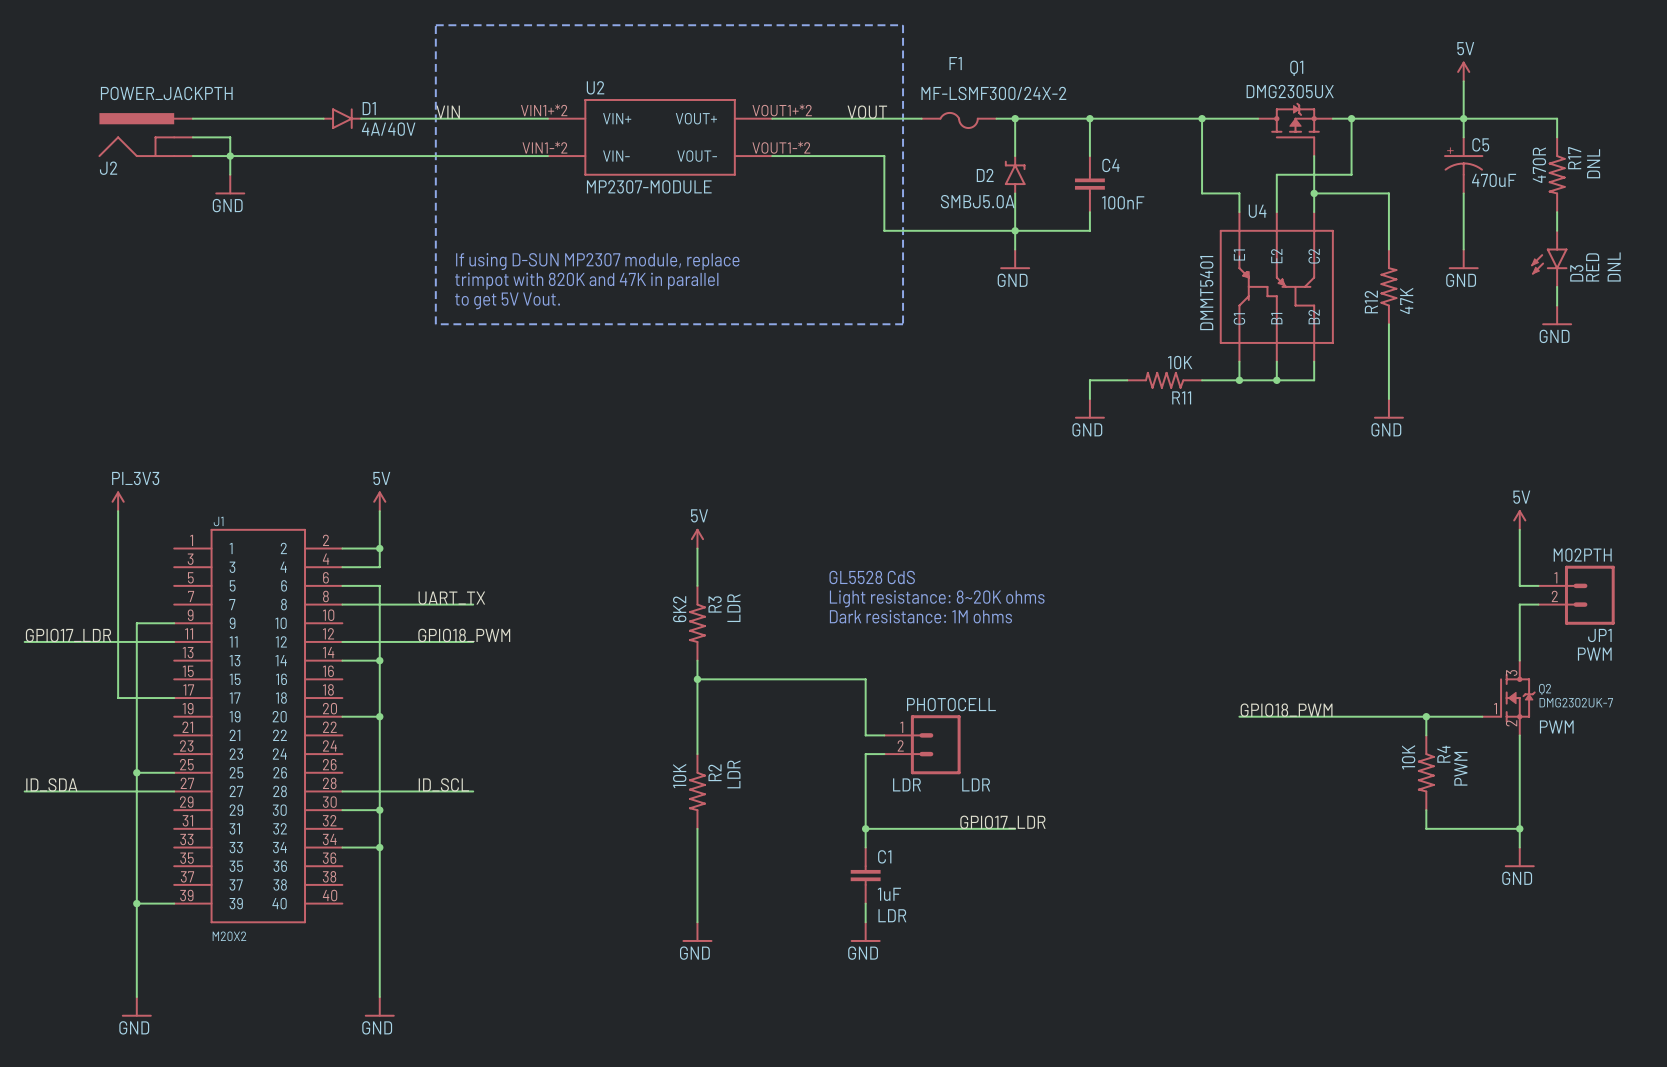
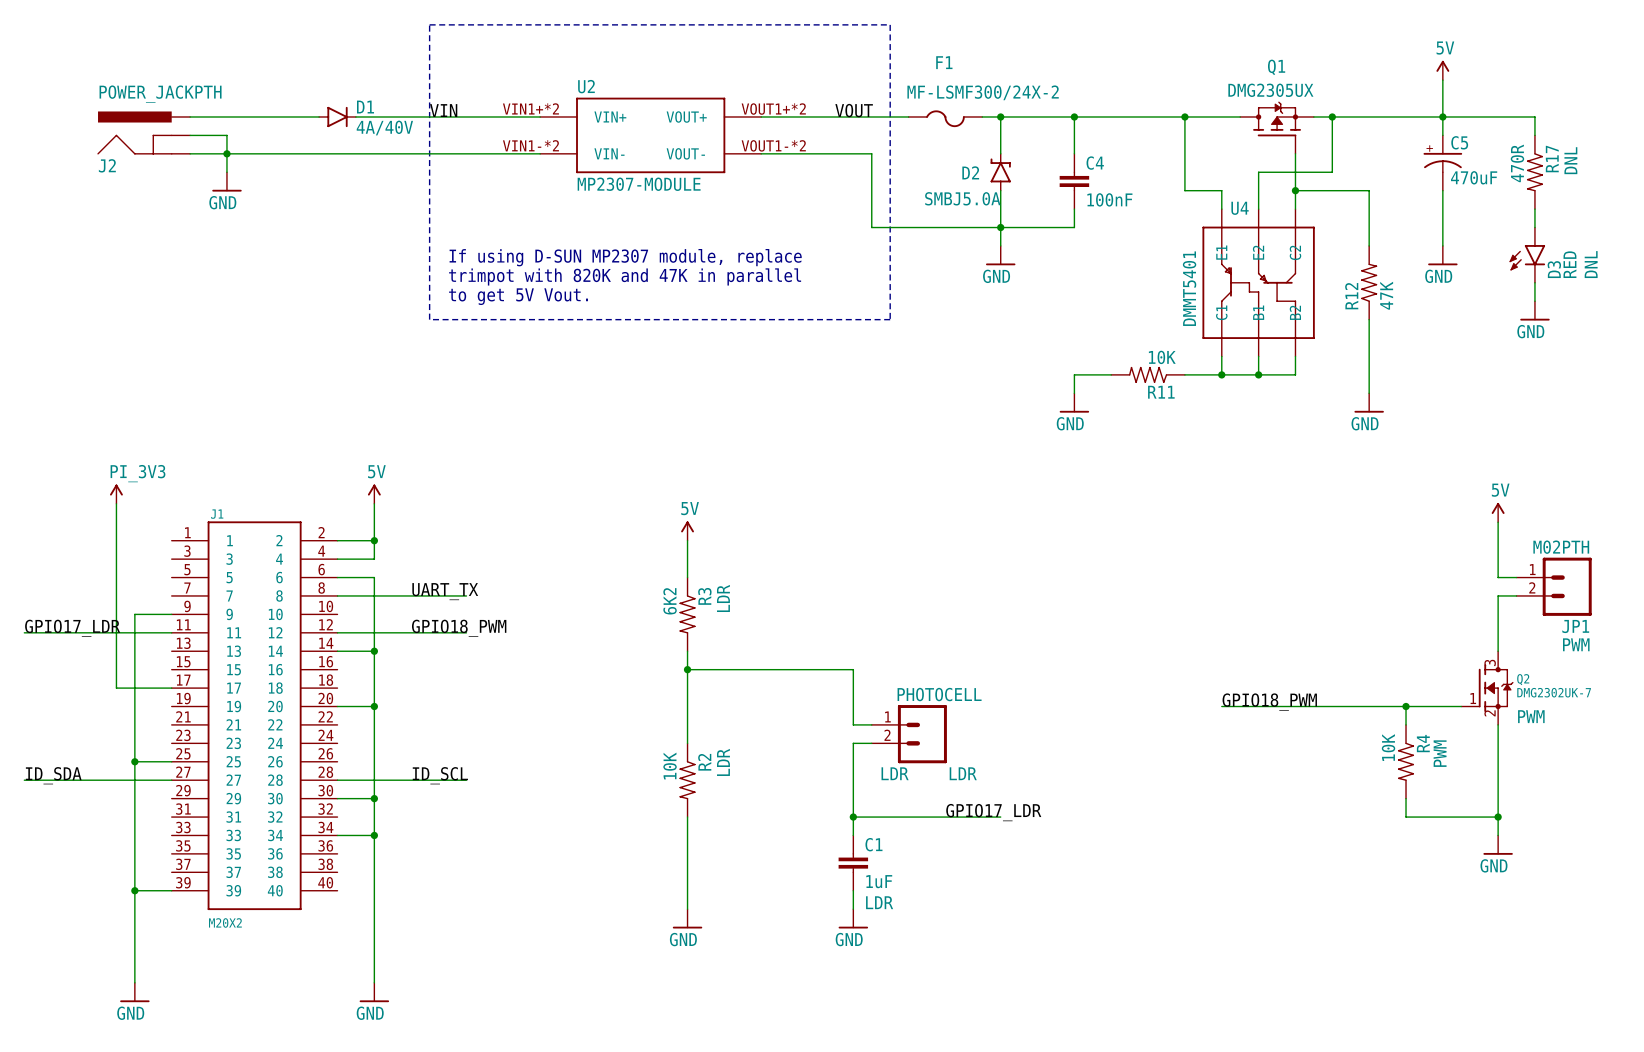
text: GL5528 CdS (872, 577) -> none
text: Light resistance: 8~20K ohms (937, 598) -> none
text: Dark resistance: 1M ohms (920, 616) -> none

